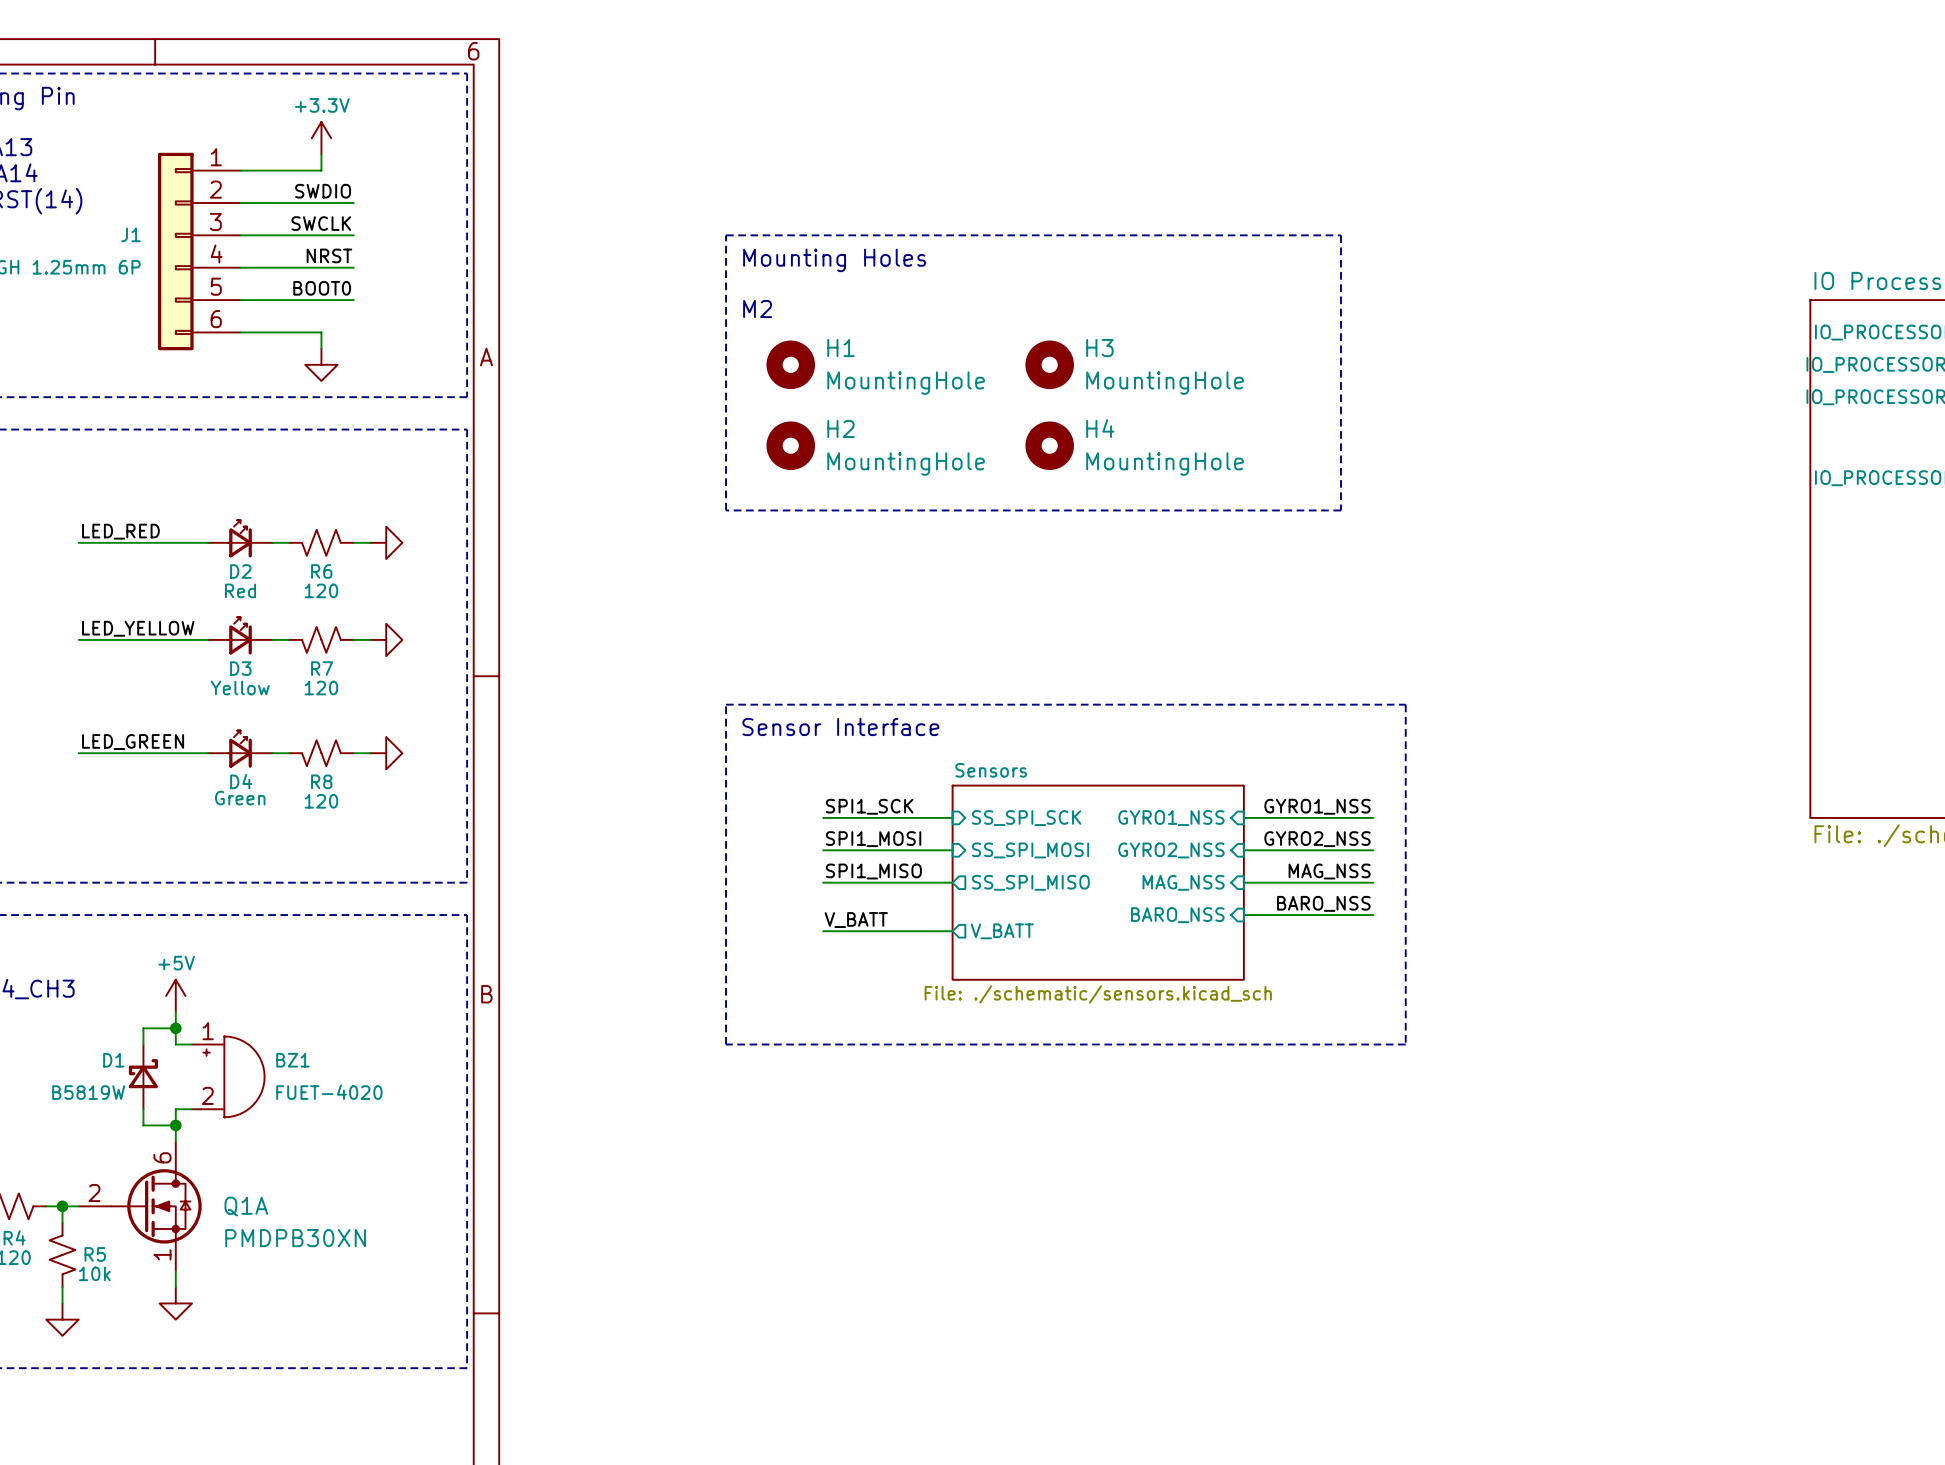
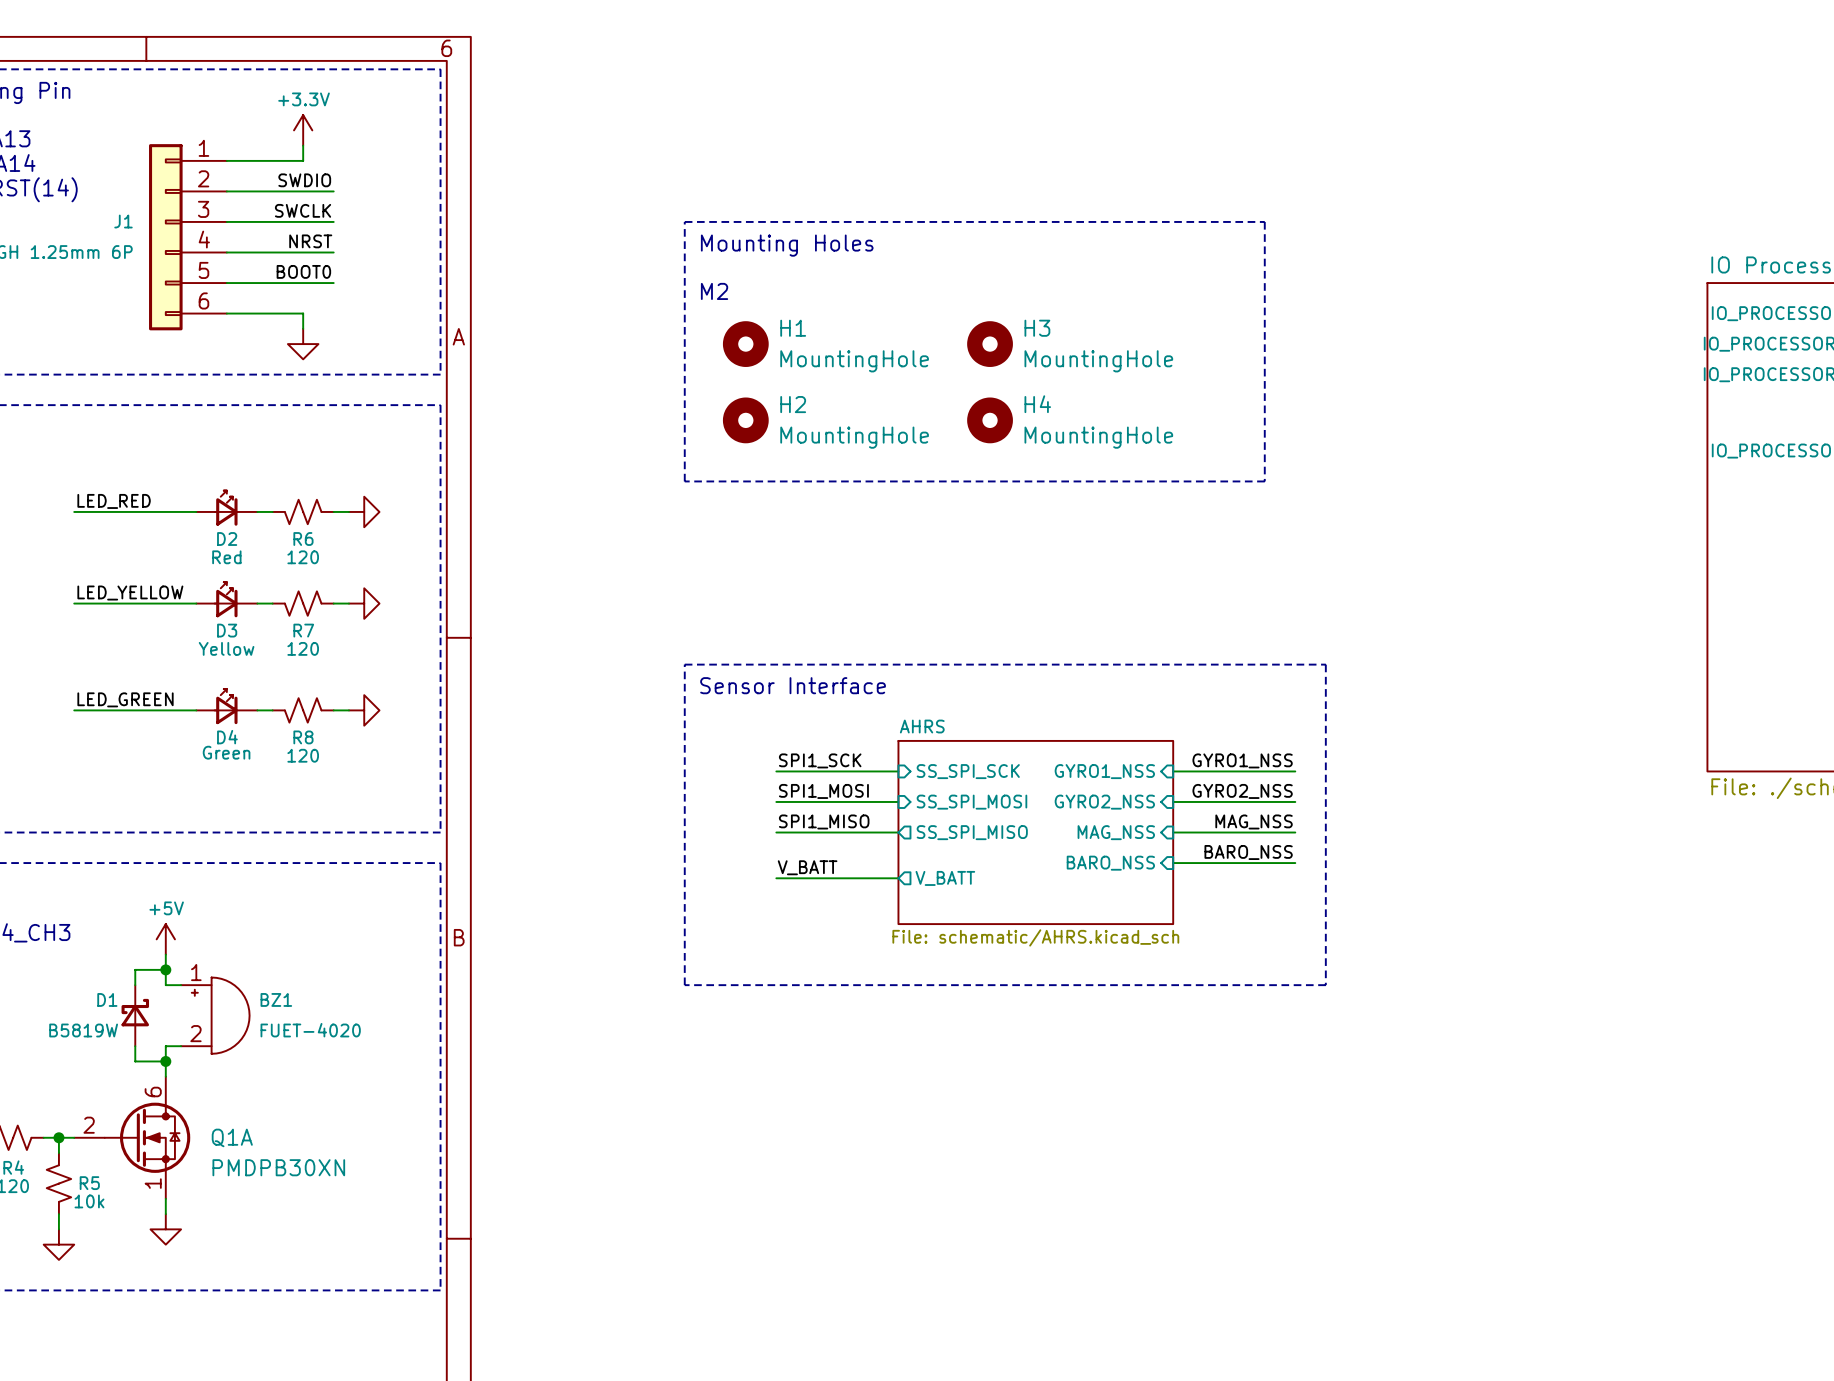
sheet Sensors name: Sensors (991, 770) -> AHRS (922, 726)
sheet Sensors value: File: ./schematic/sensors.kicad_sch (1098, 994) -> File: schematic/AHRS.kicad_sch (1035, 937)

